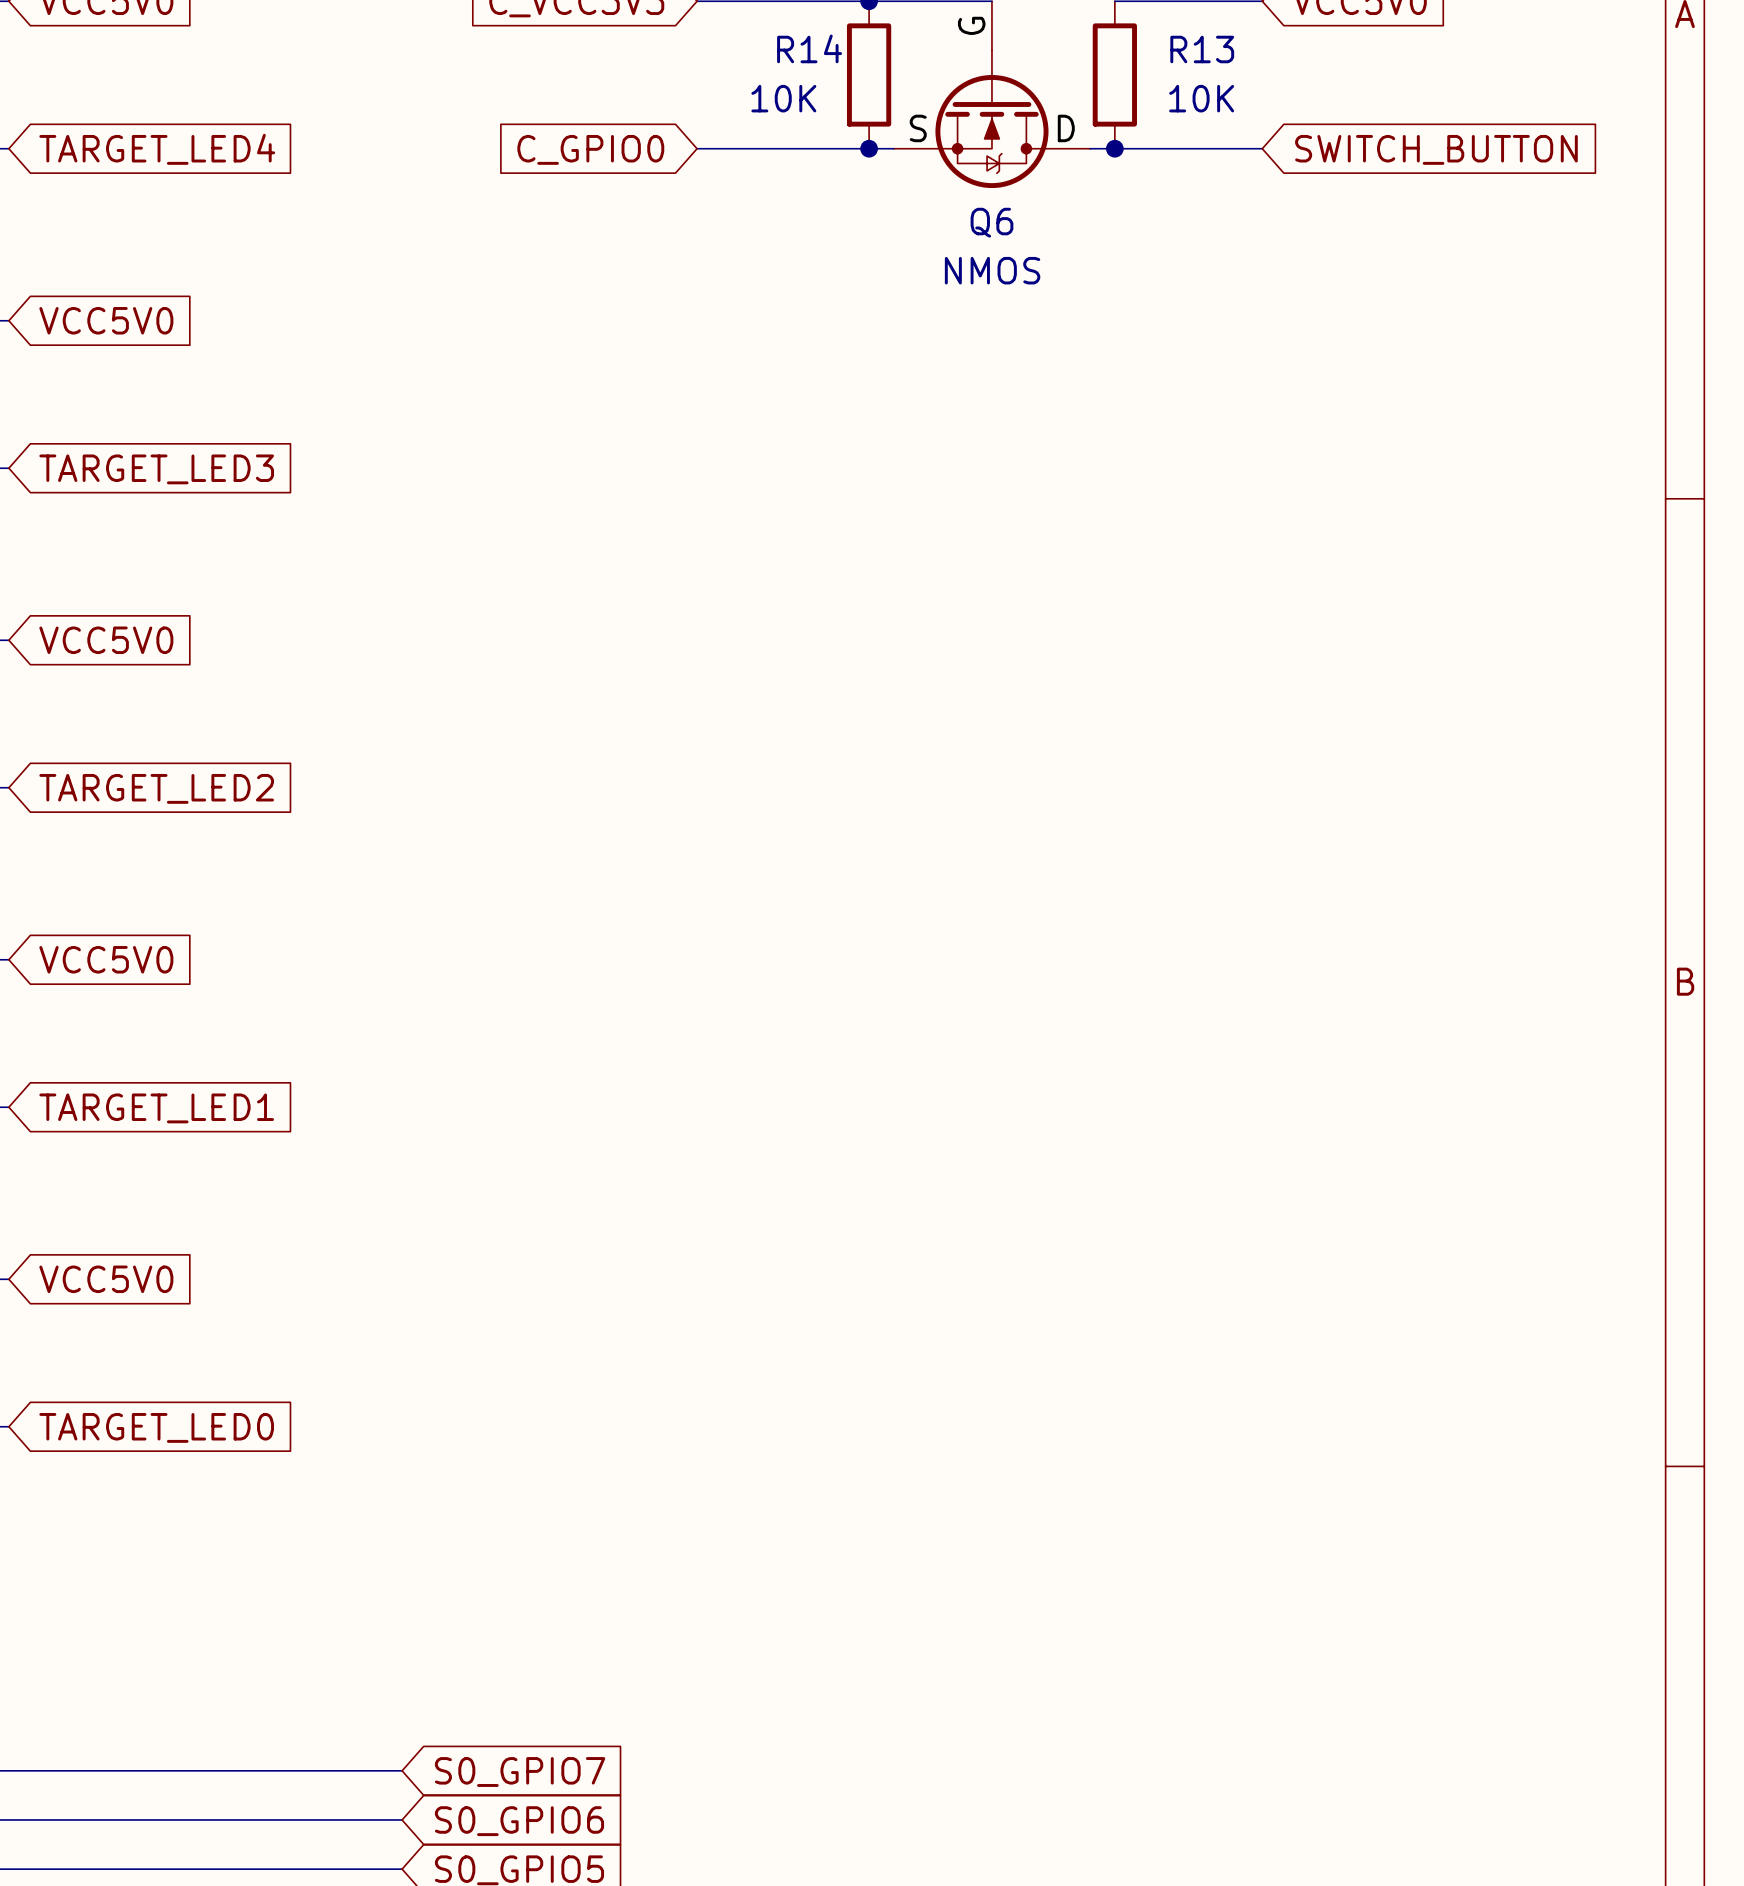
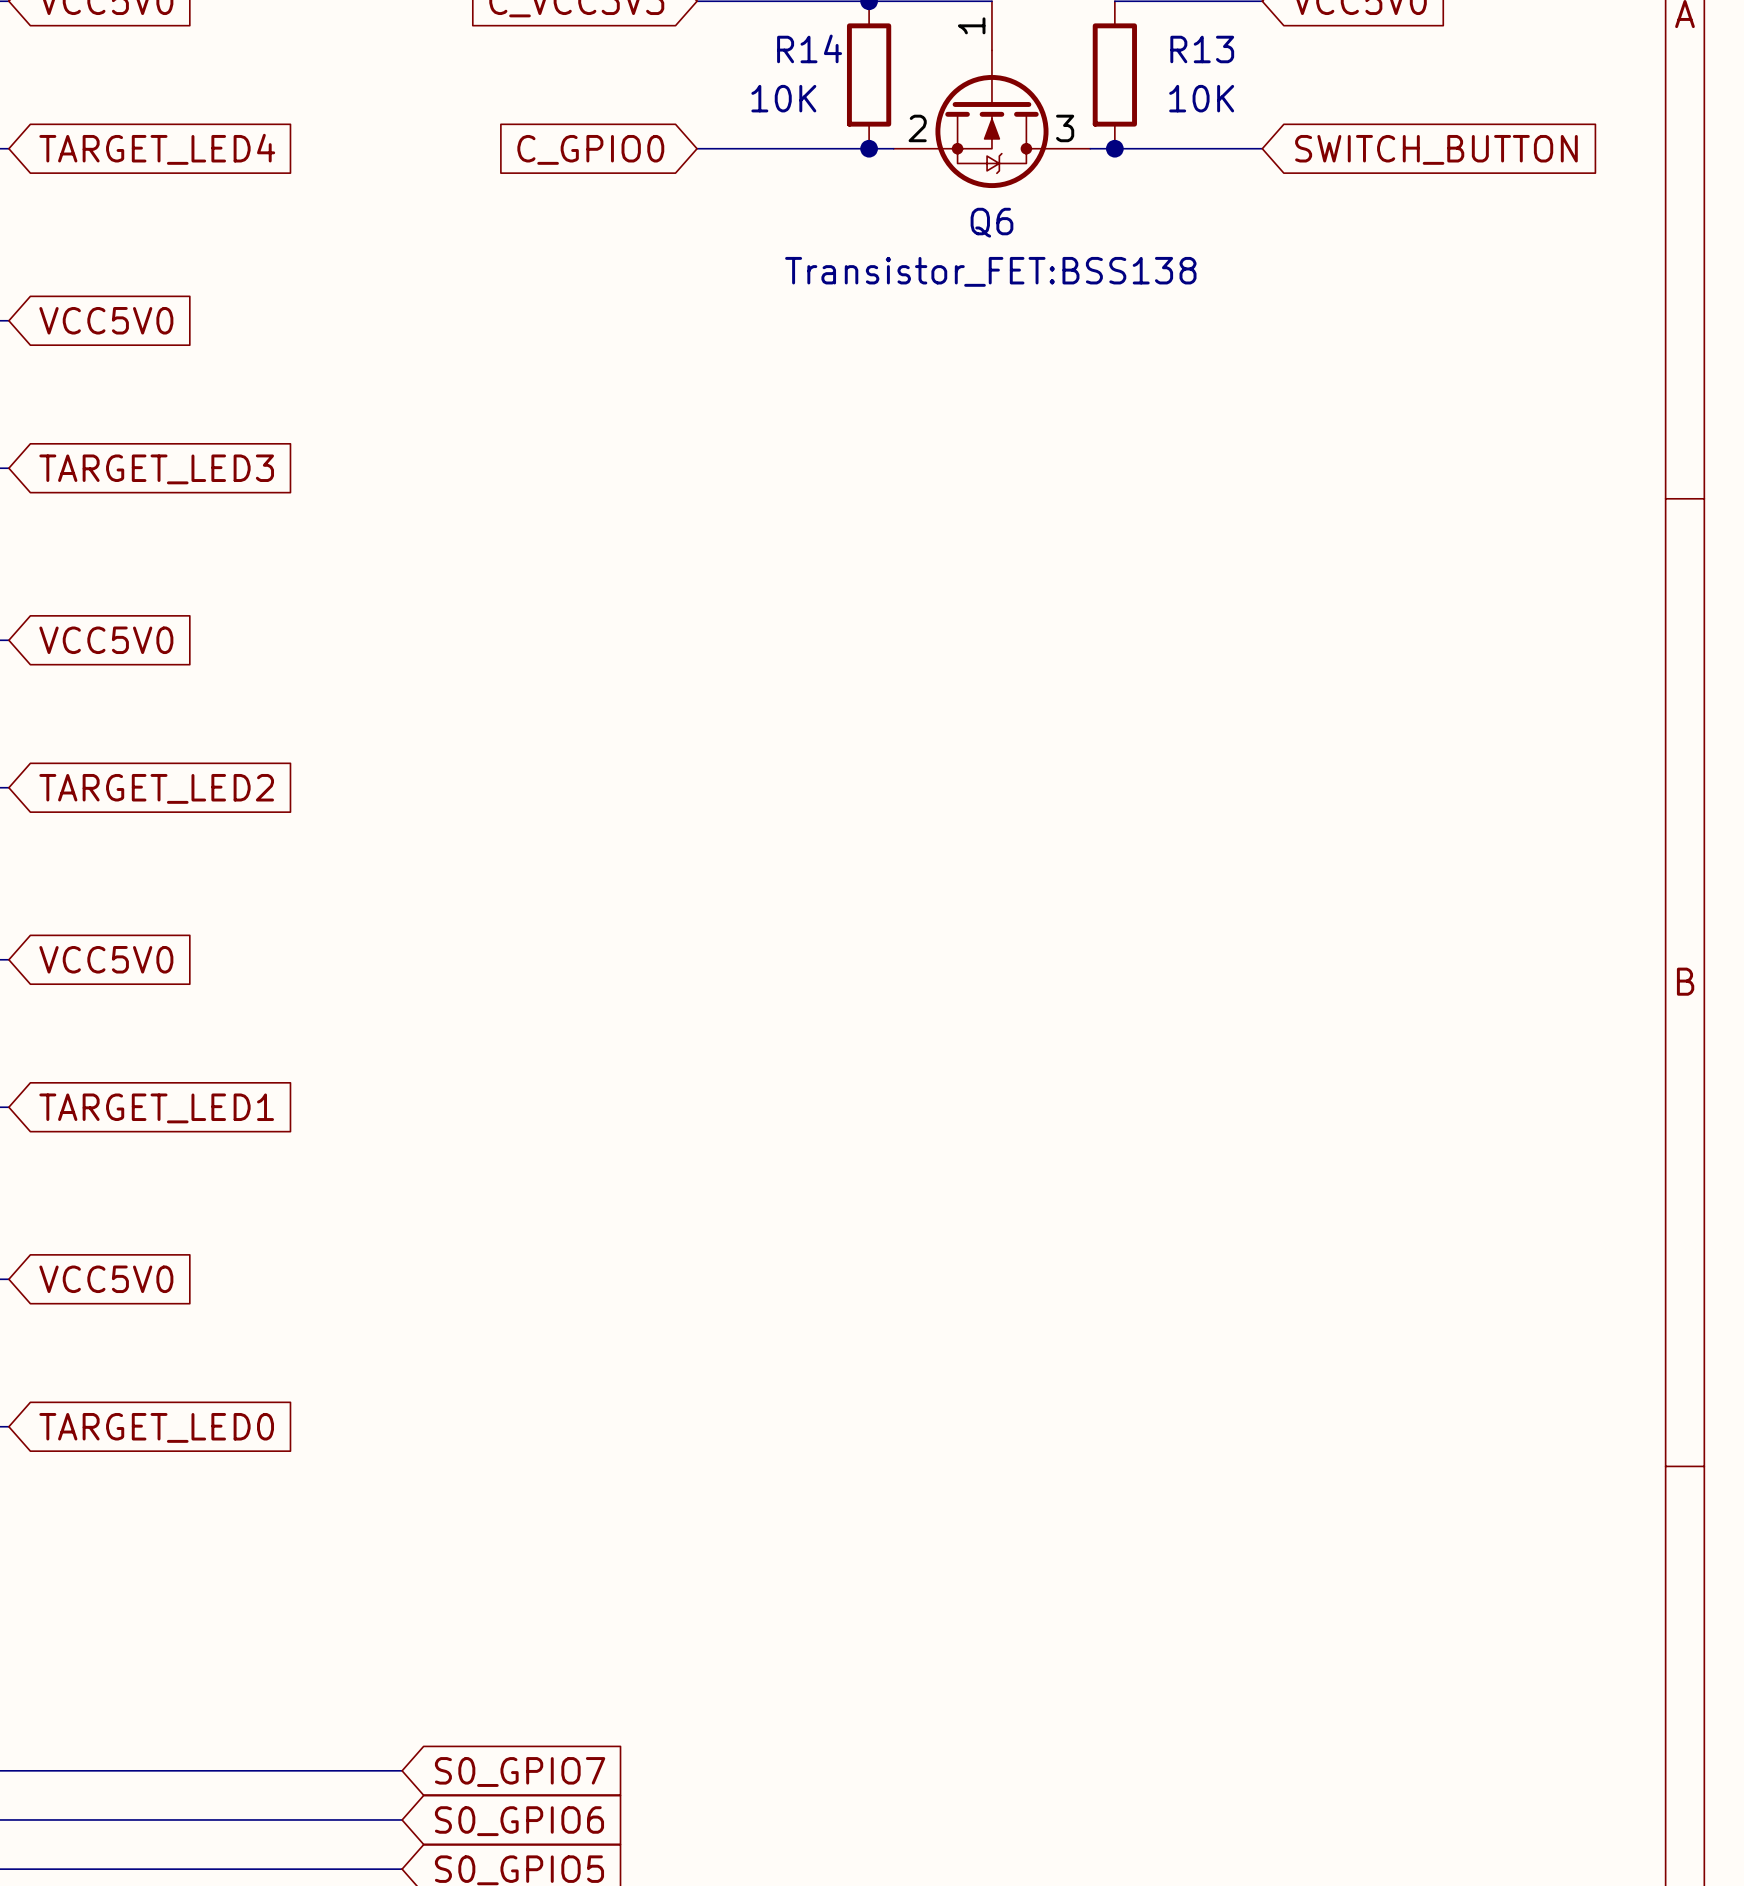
Q6 pin name: G (971, 25) -> none
Q6 pin number: none -> 1 (971, 25)
Q6 pin number: none -> 2 (917, 128)
Q6 pin name: S (918, 128) -> none
Q6 pin number: none -> 3 (1065, 128)
Q6 pin name: D (1066, 128) -> none
Q6 value: NMOS (992, 270) -> Transistor_FET:BSS138 (990, 271)

